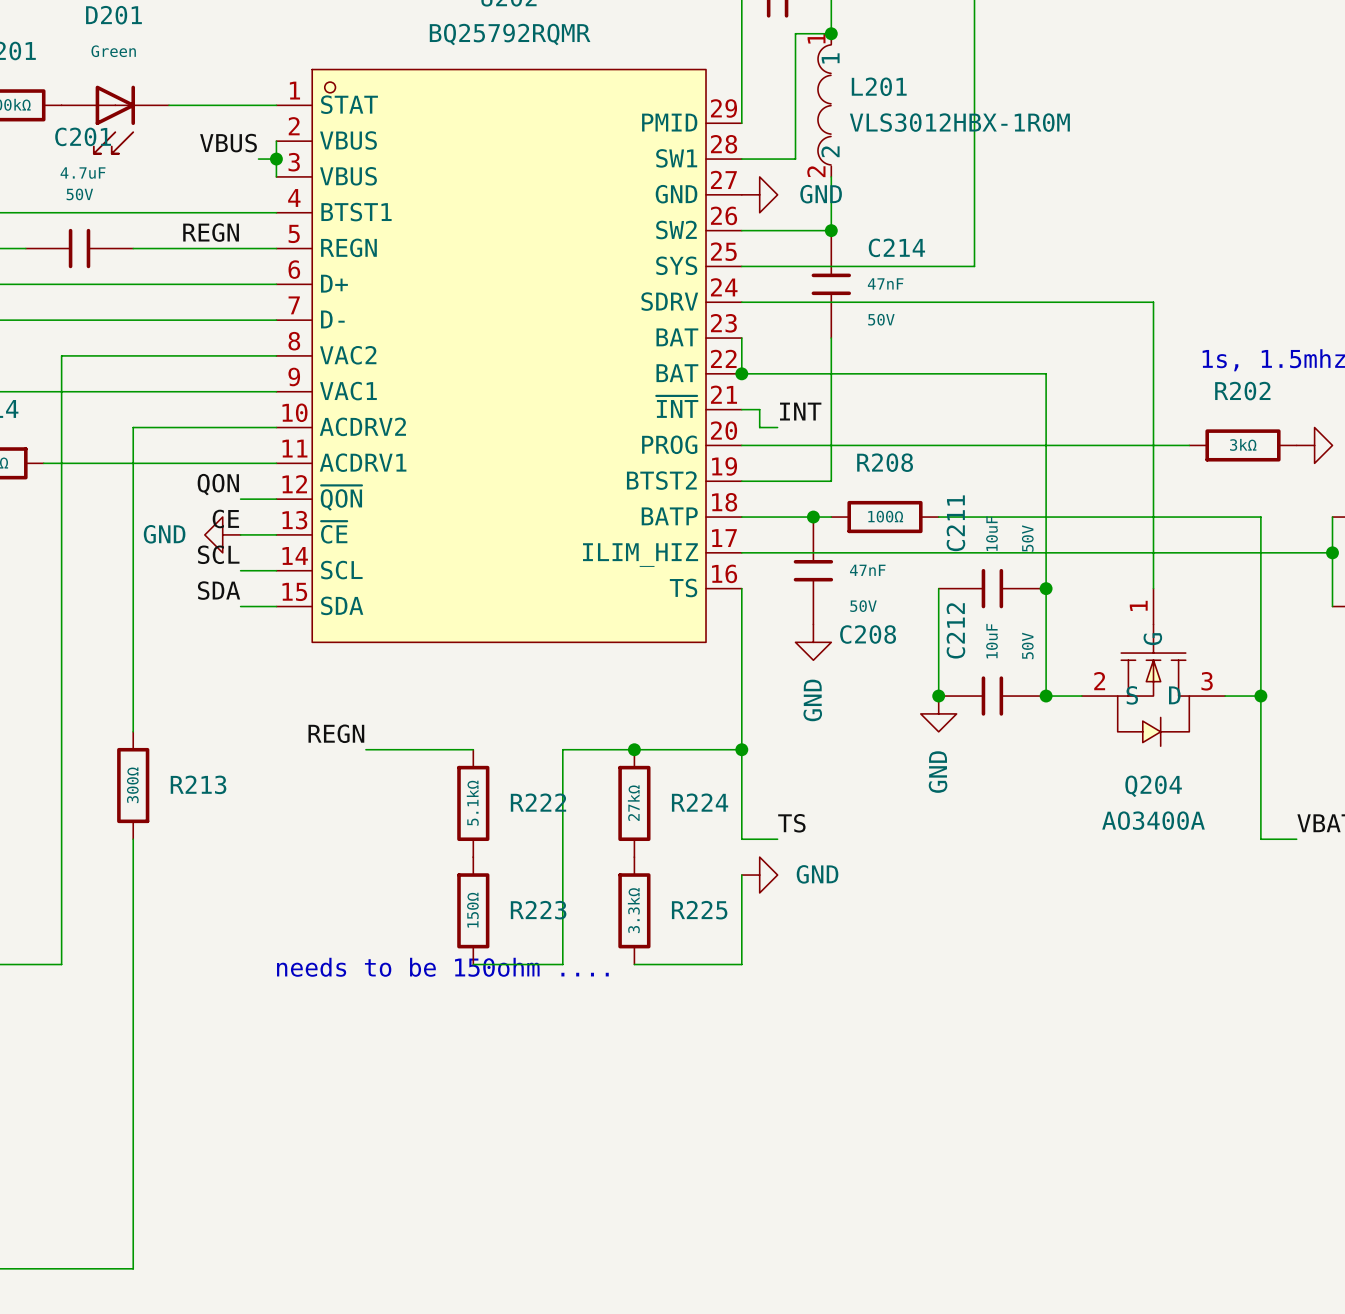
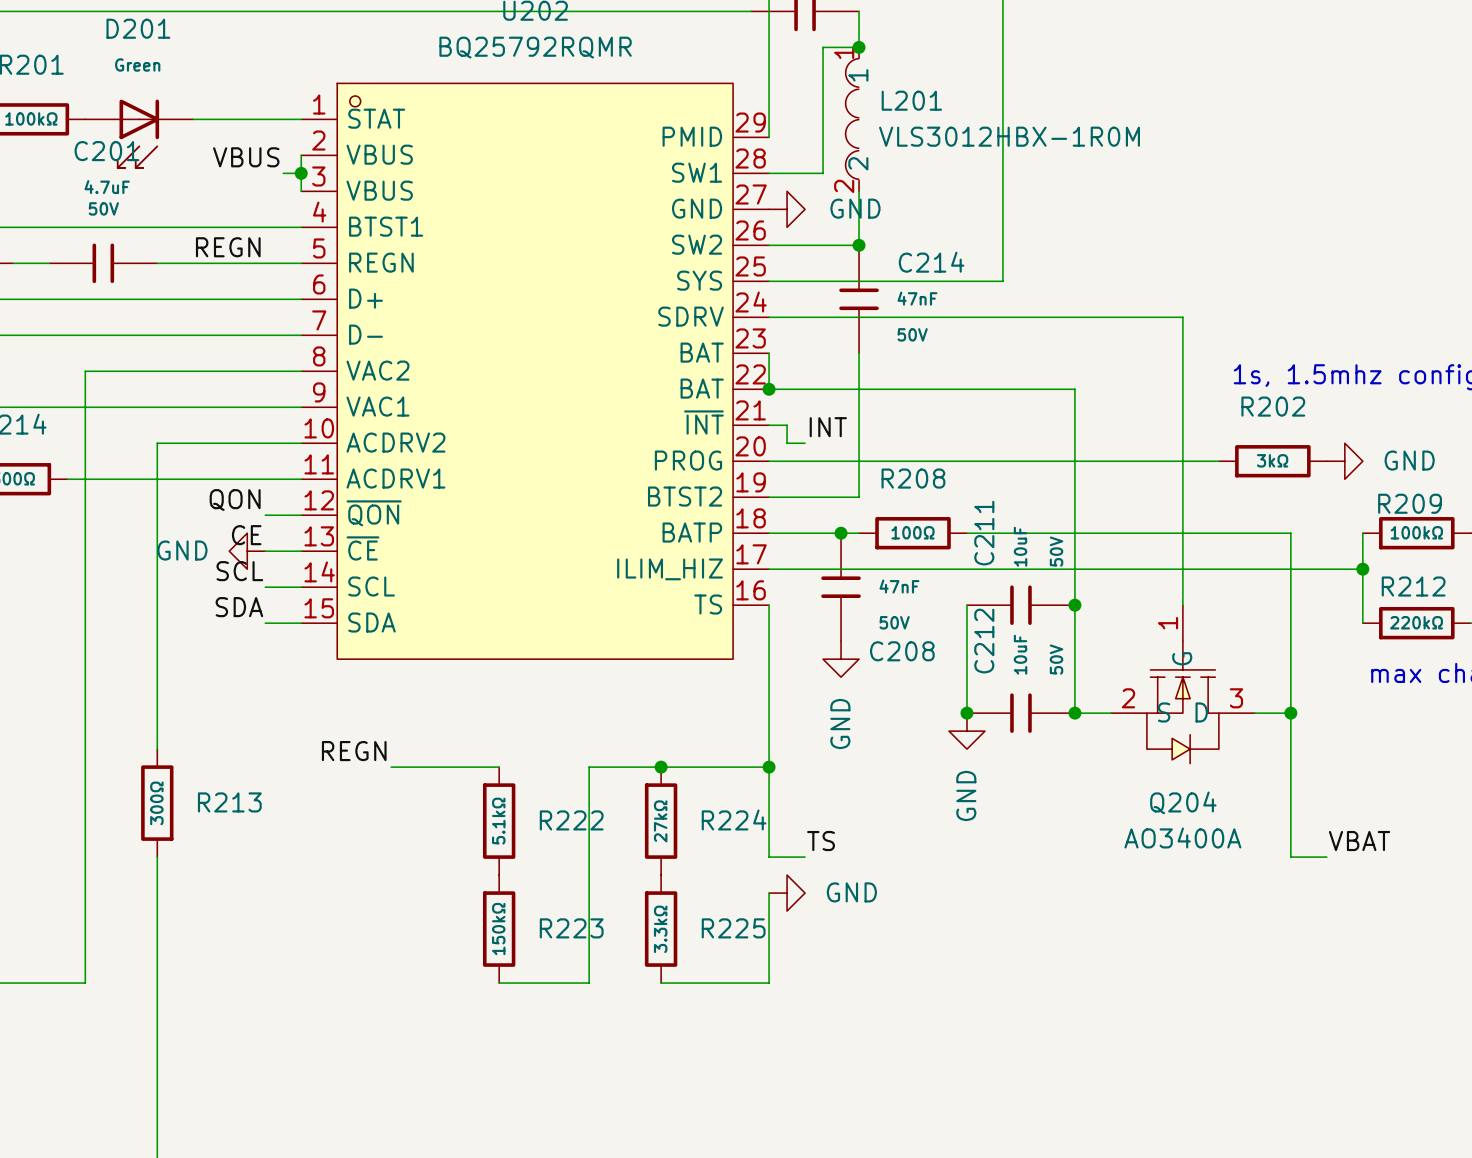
R223 value: 150Ω (472, 910) -> 150kΩ (498, 929)
text: needs to be 150ohm .... (442, 967) -> none

